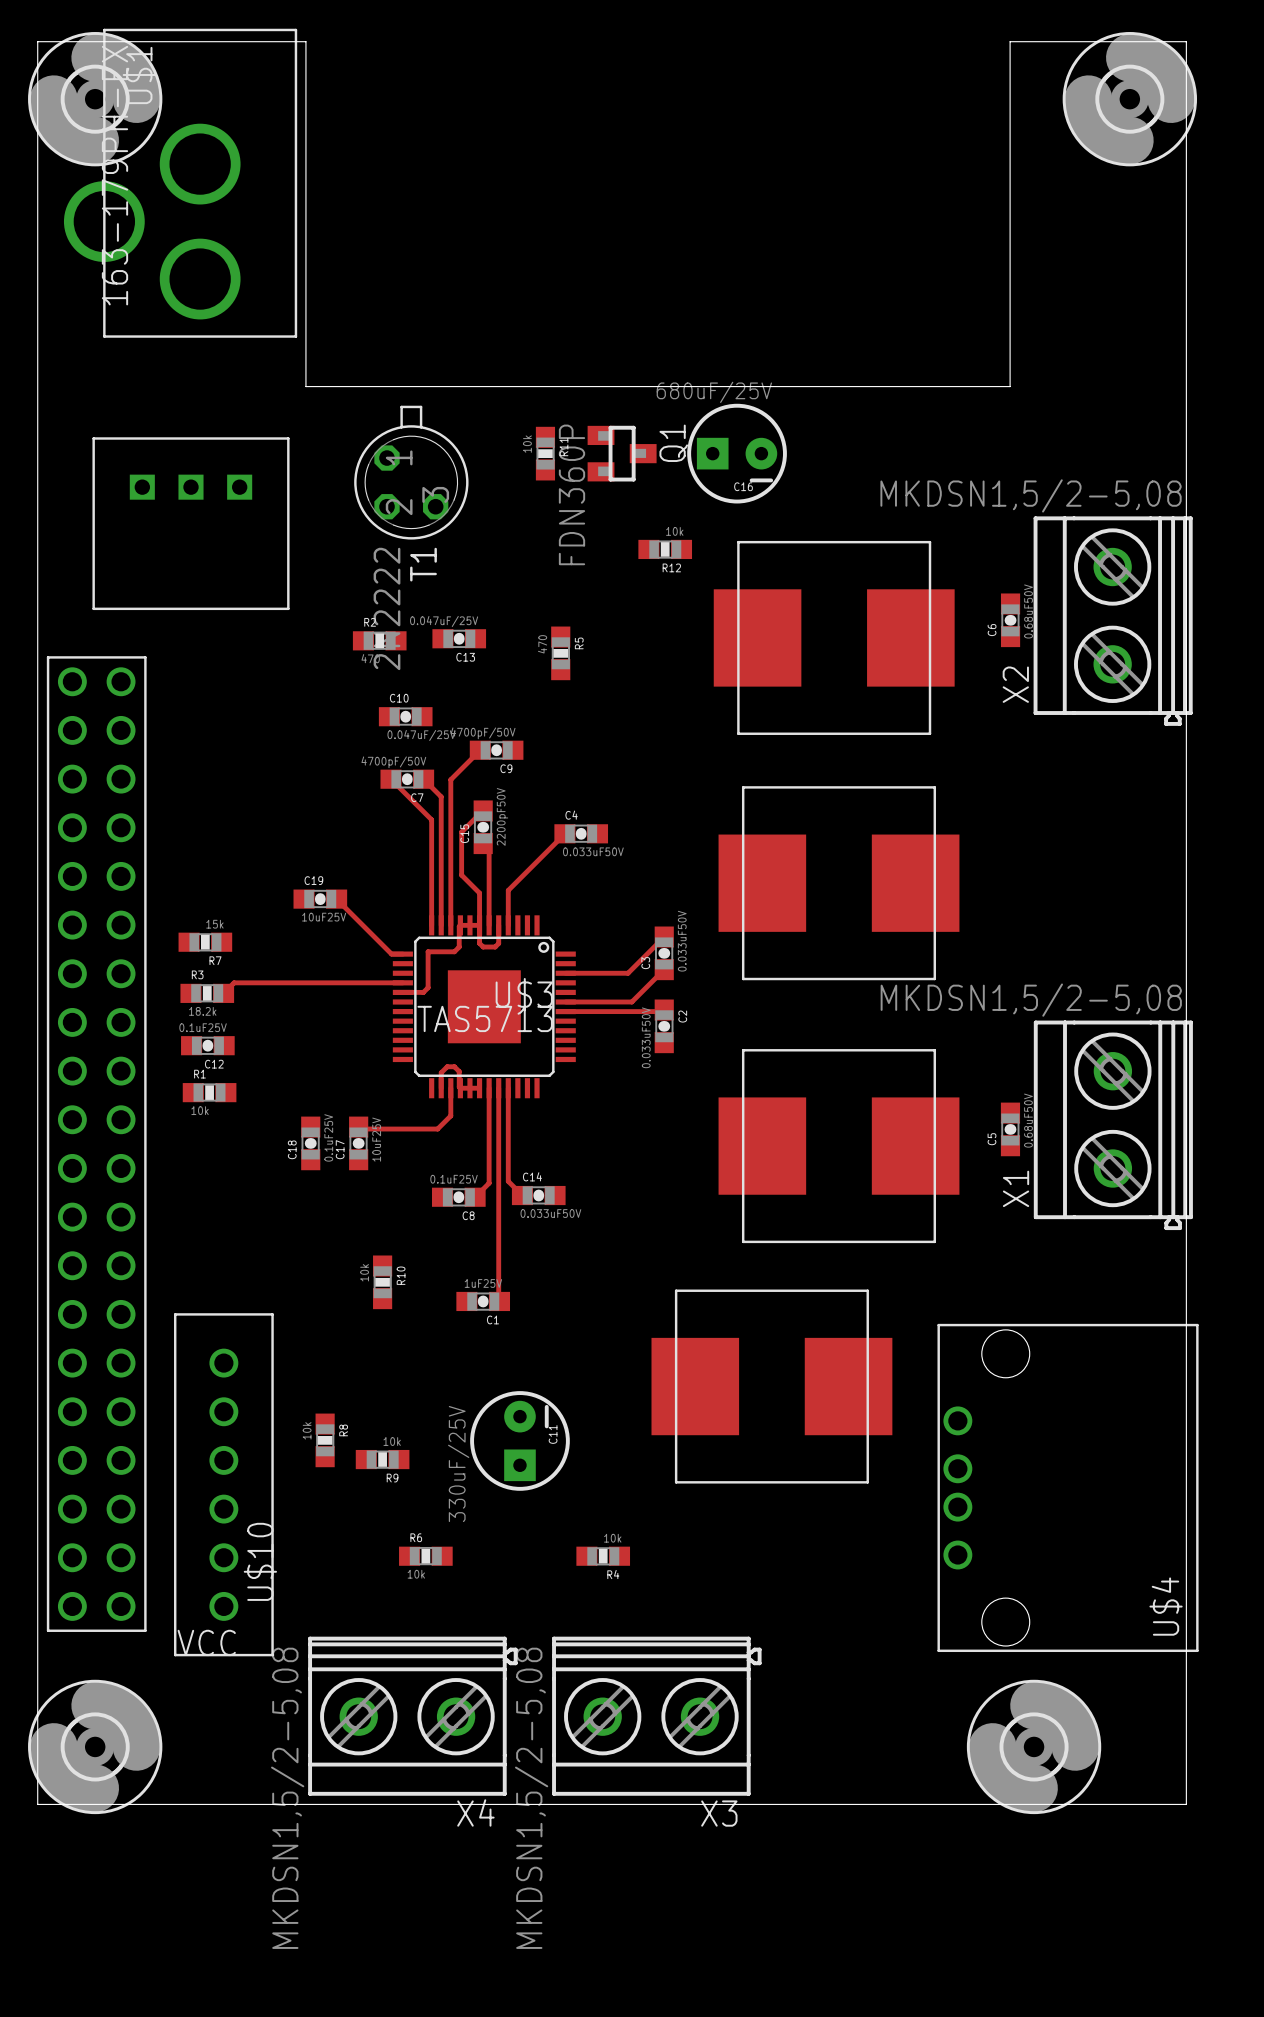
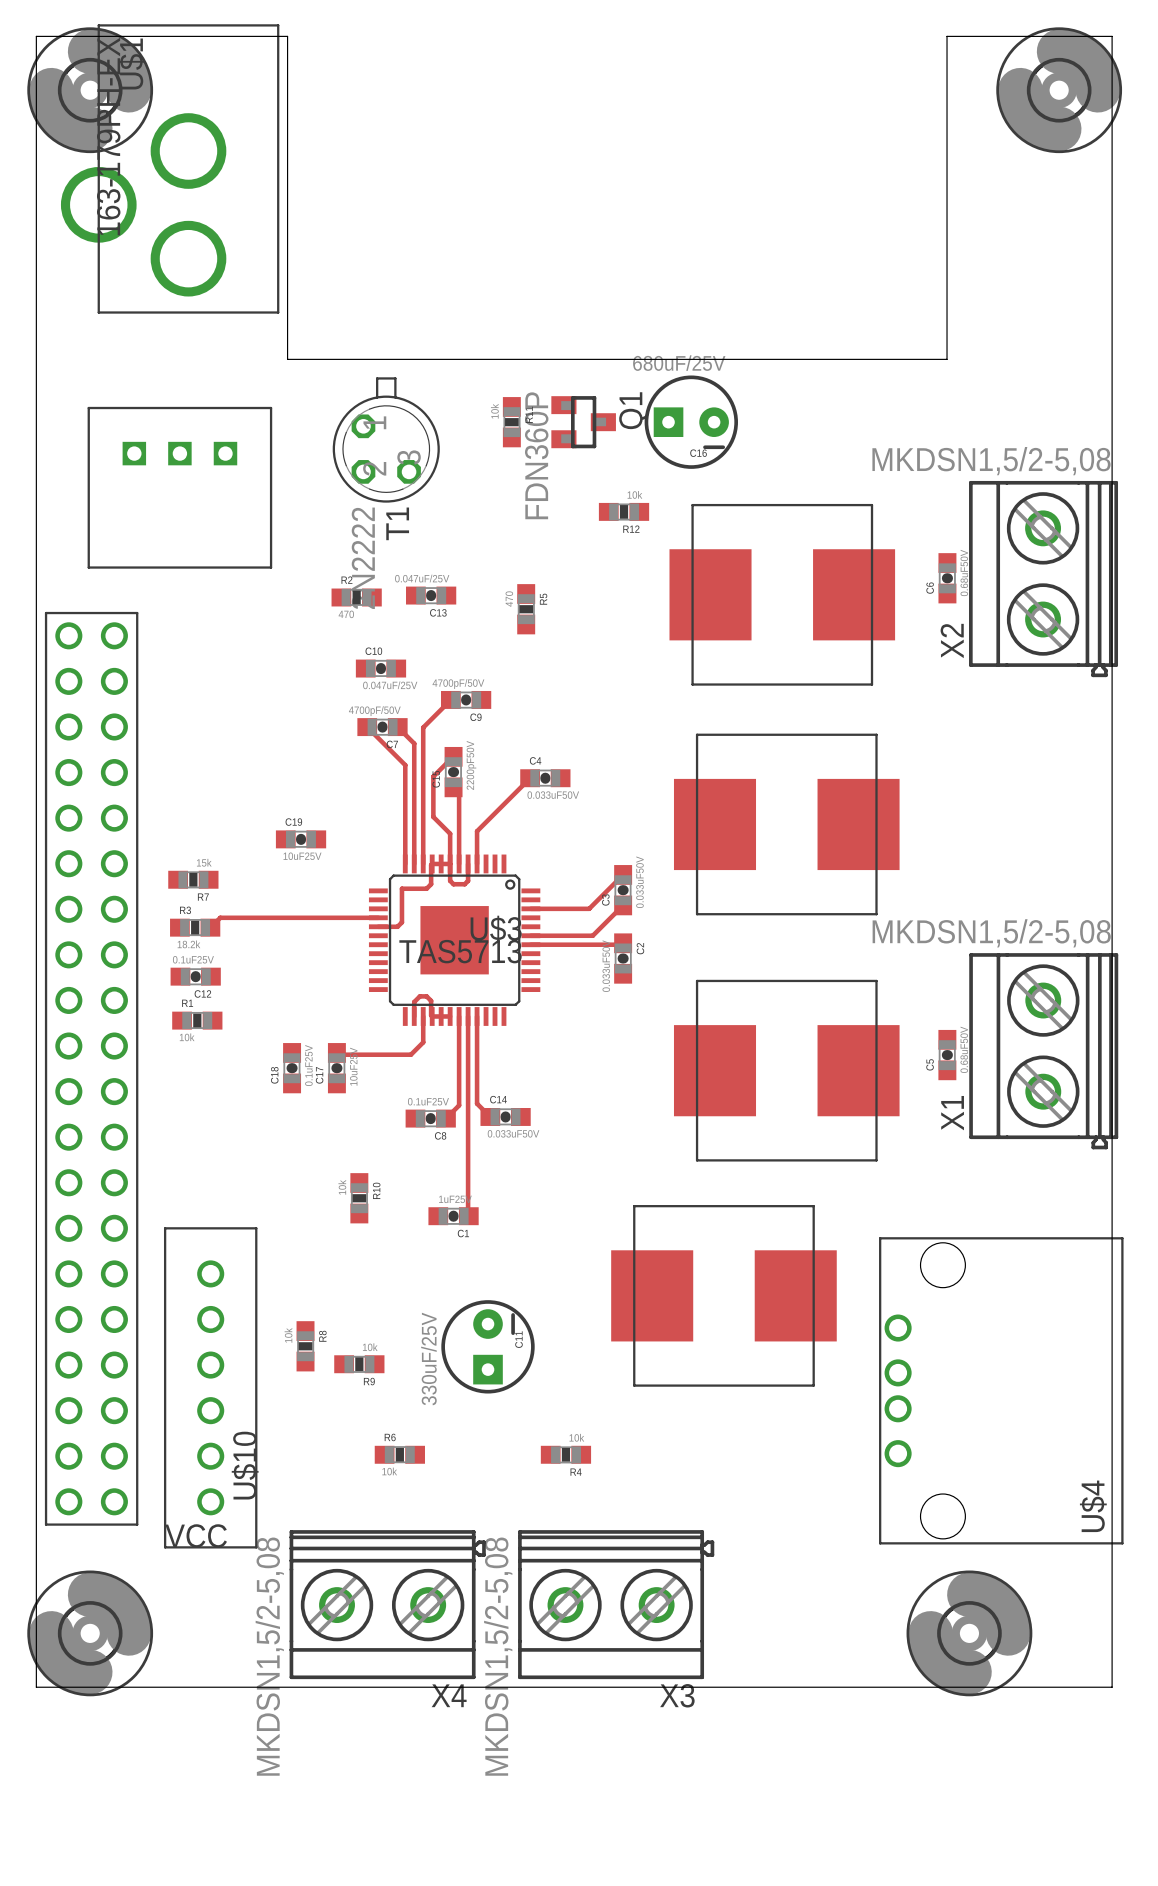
top track: (336, 899) (391, 954) (402, 954) -> none

